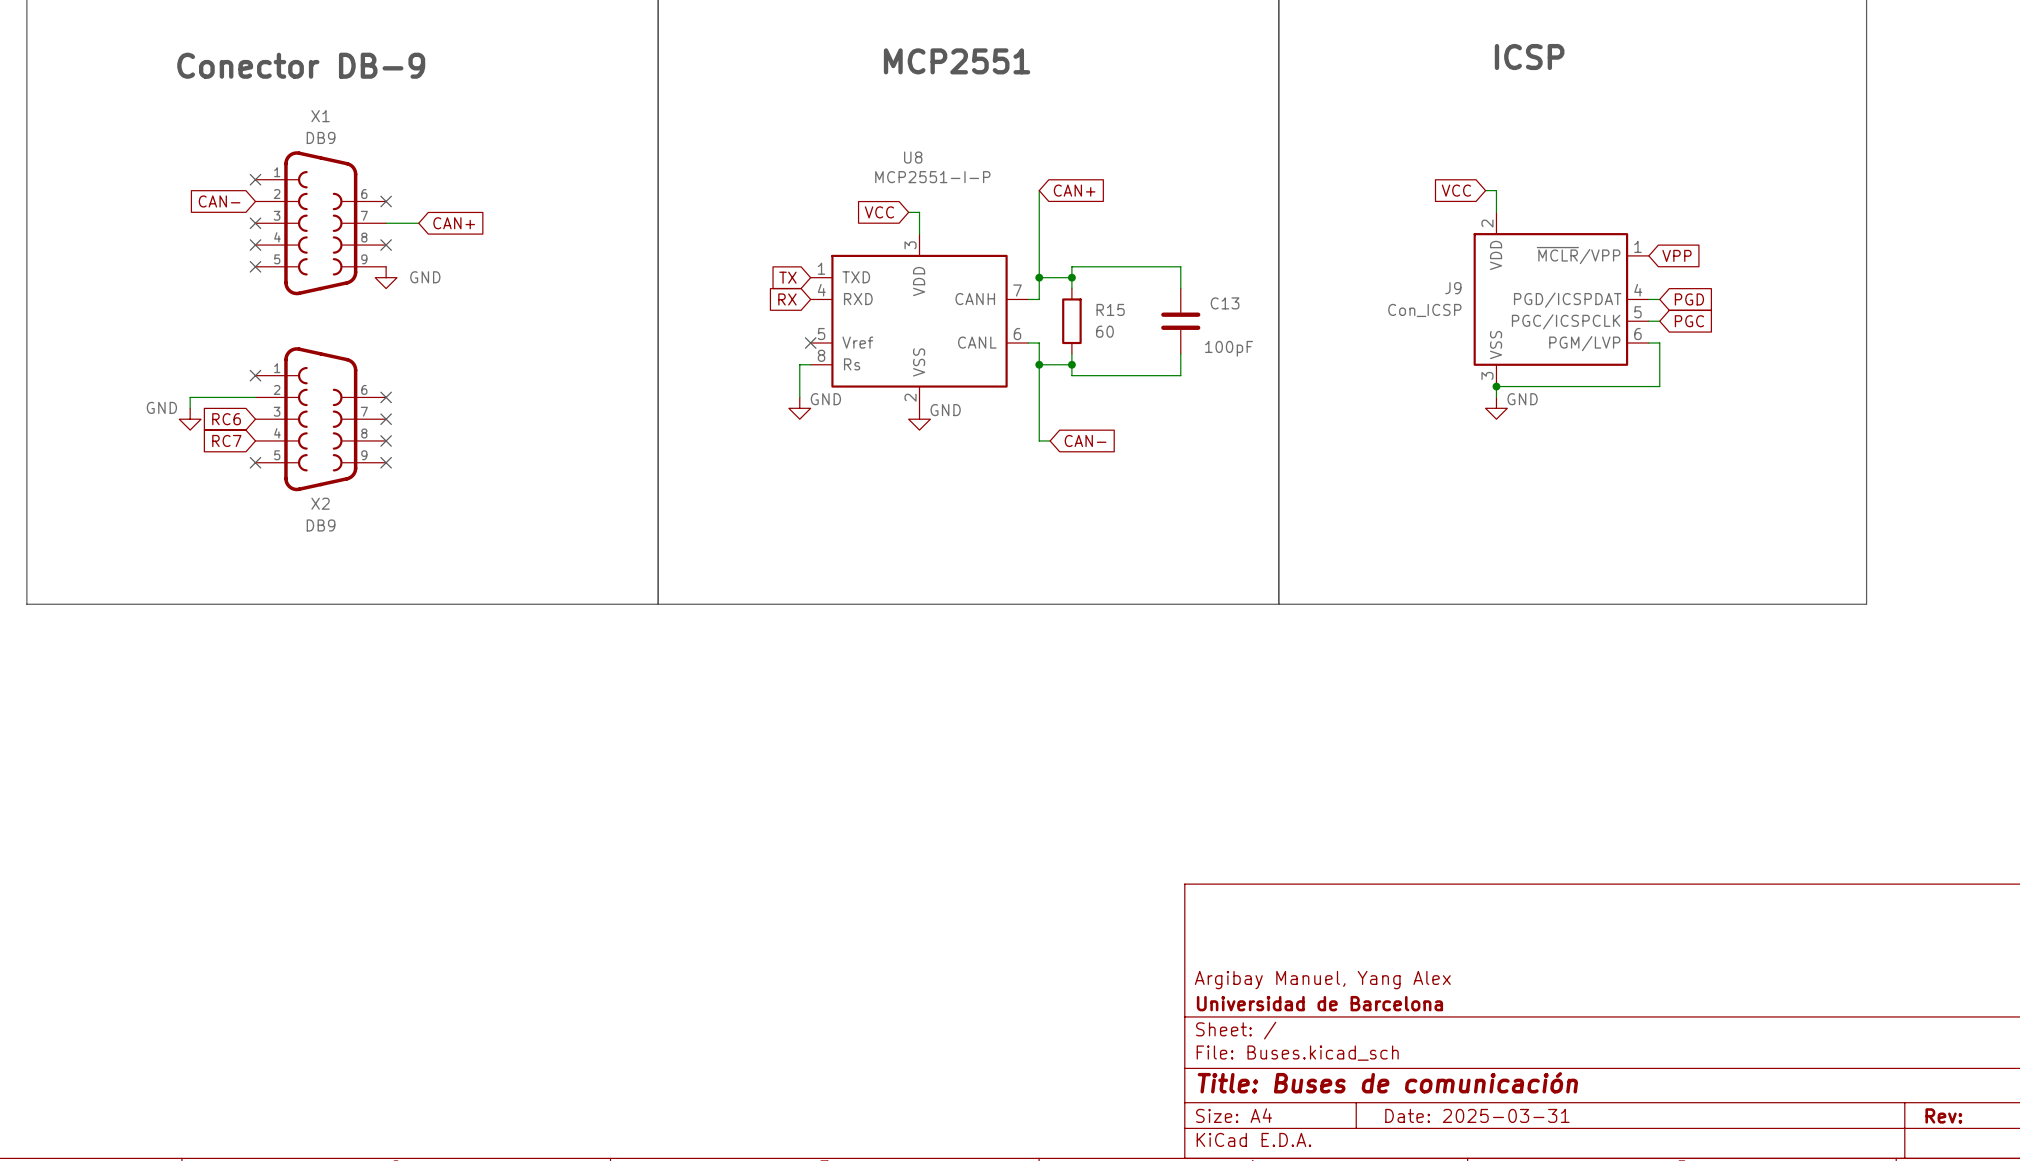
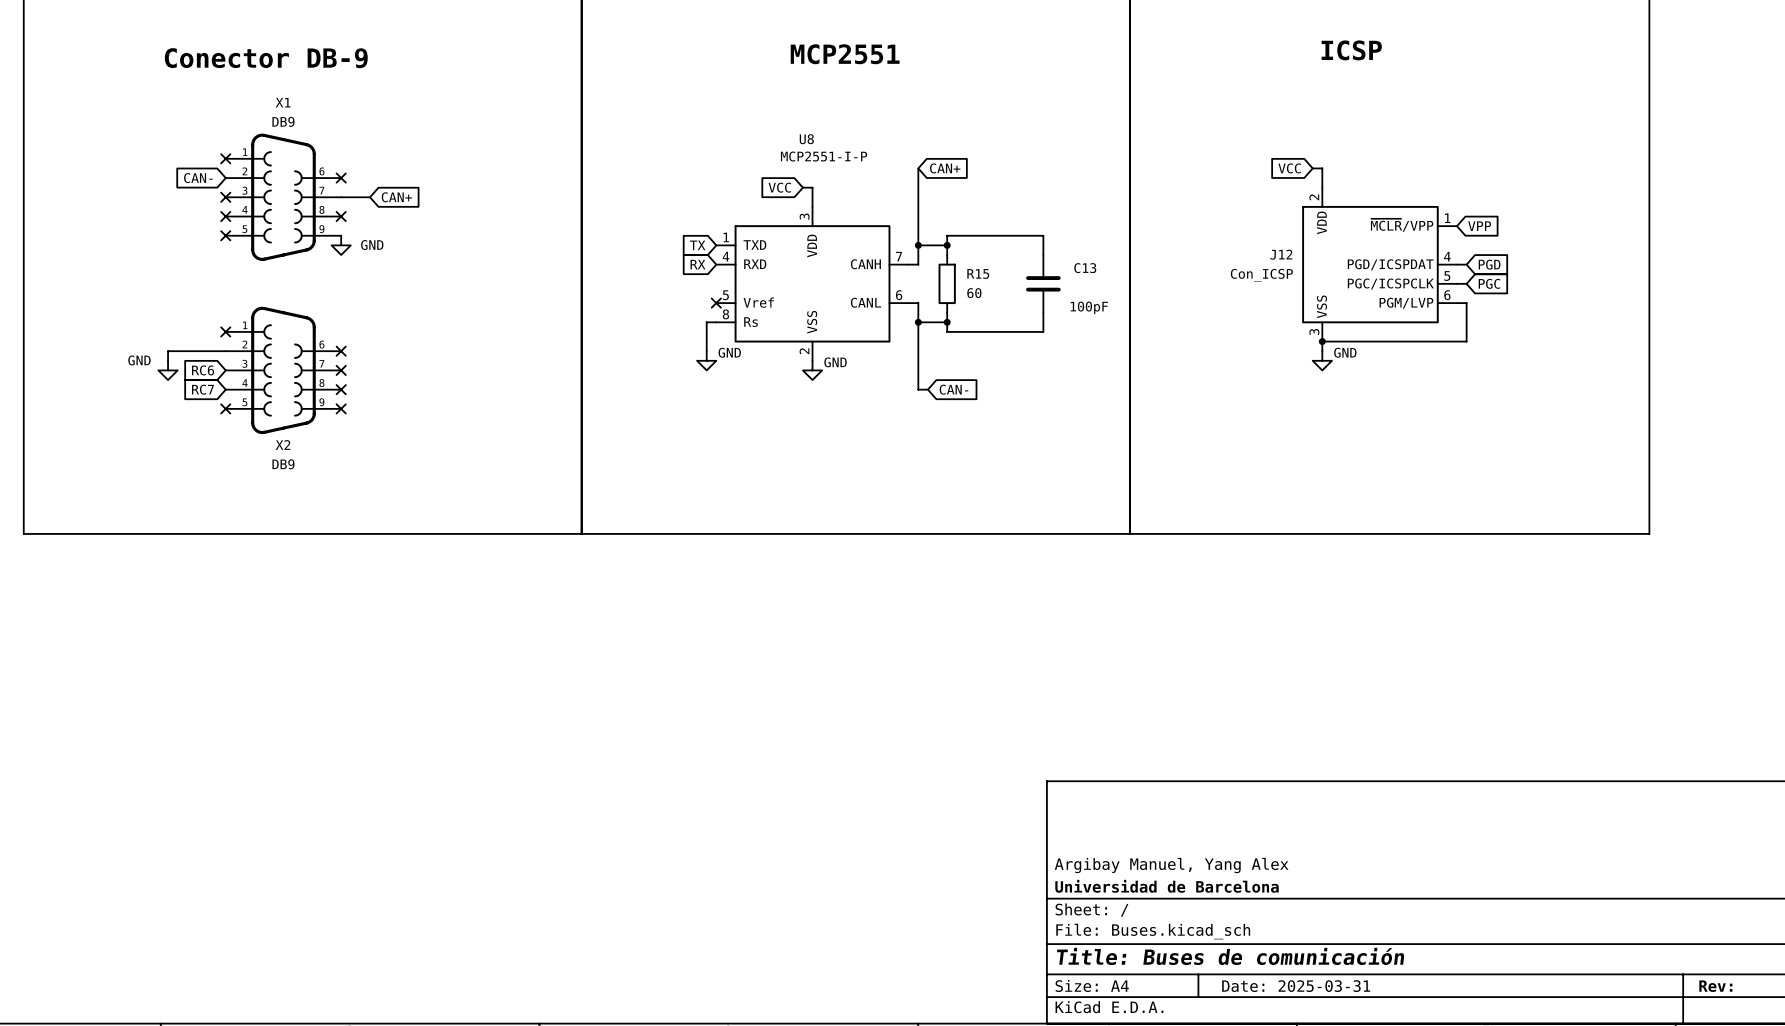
J9 name: J9 (1453, 288) -> J12 (1281, 254)

